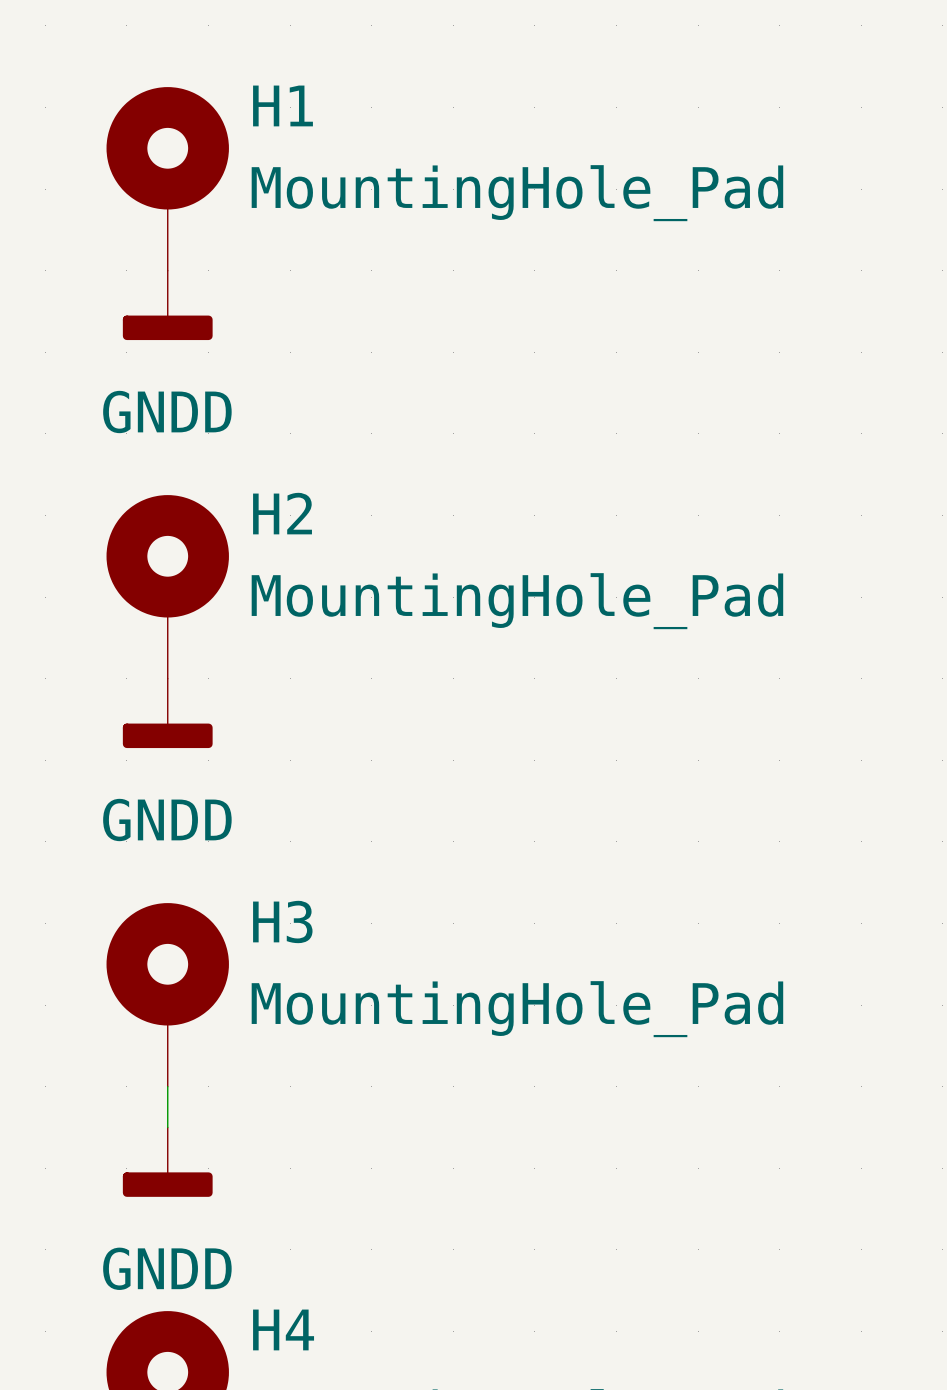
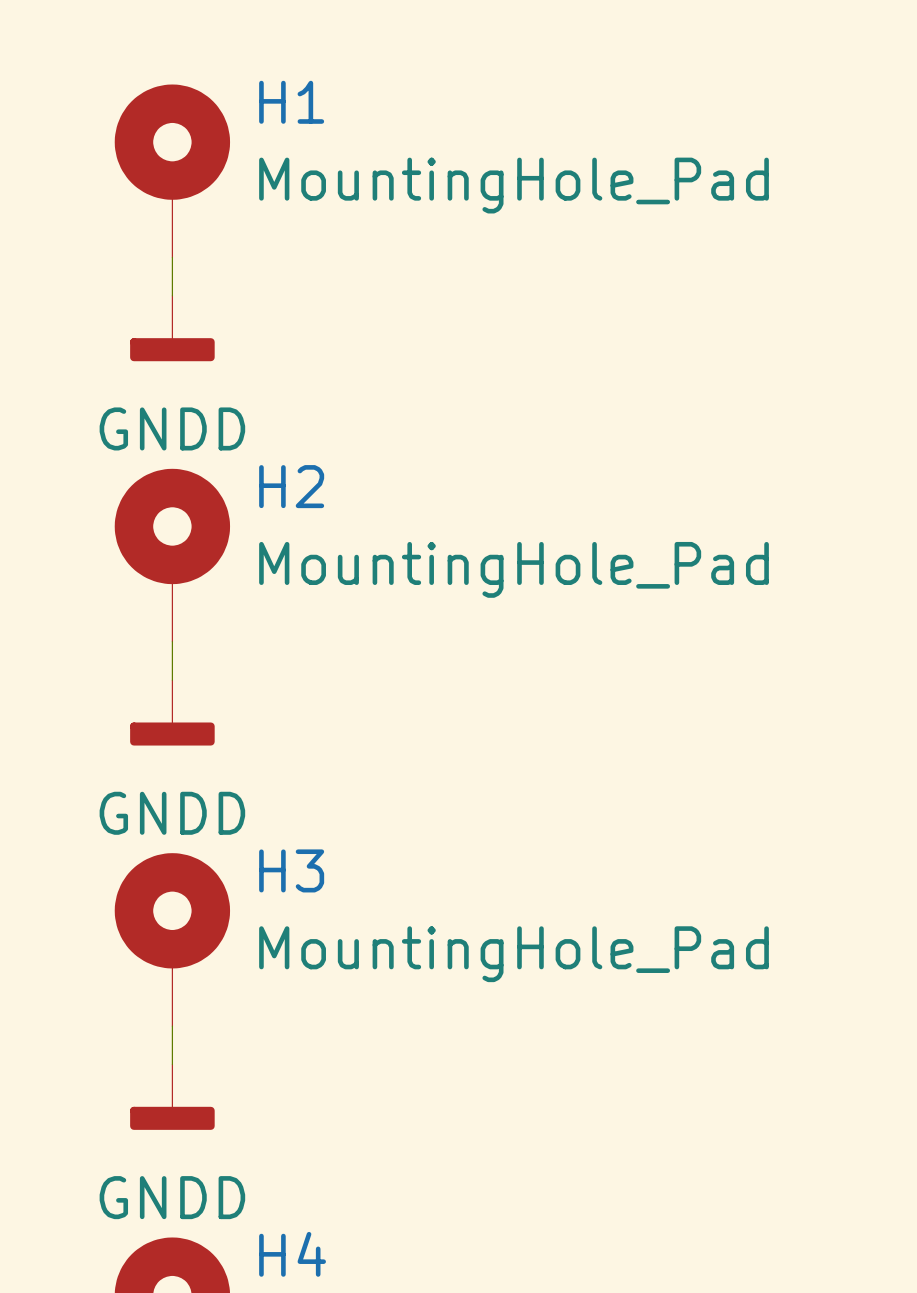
power symbol position: GNDD (167, 305) -> GNDD (172, 328)
power symbol position: GNDD (167, 713) -> GNDD (172, 712)

